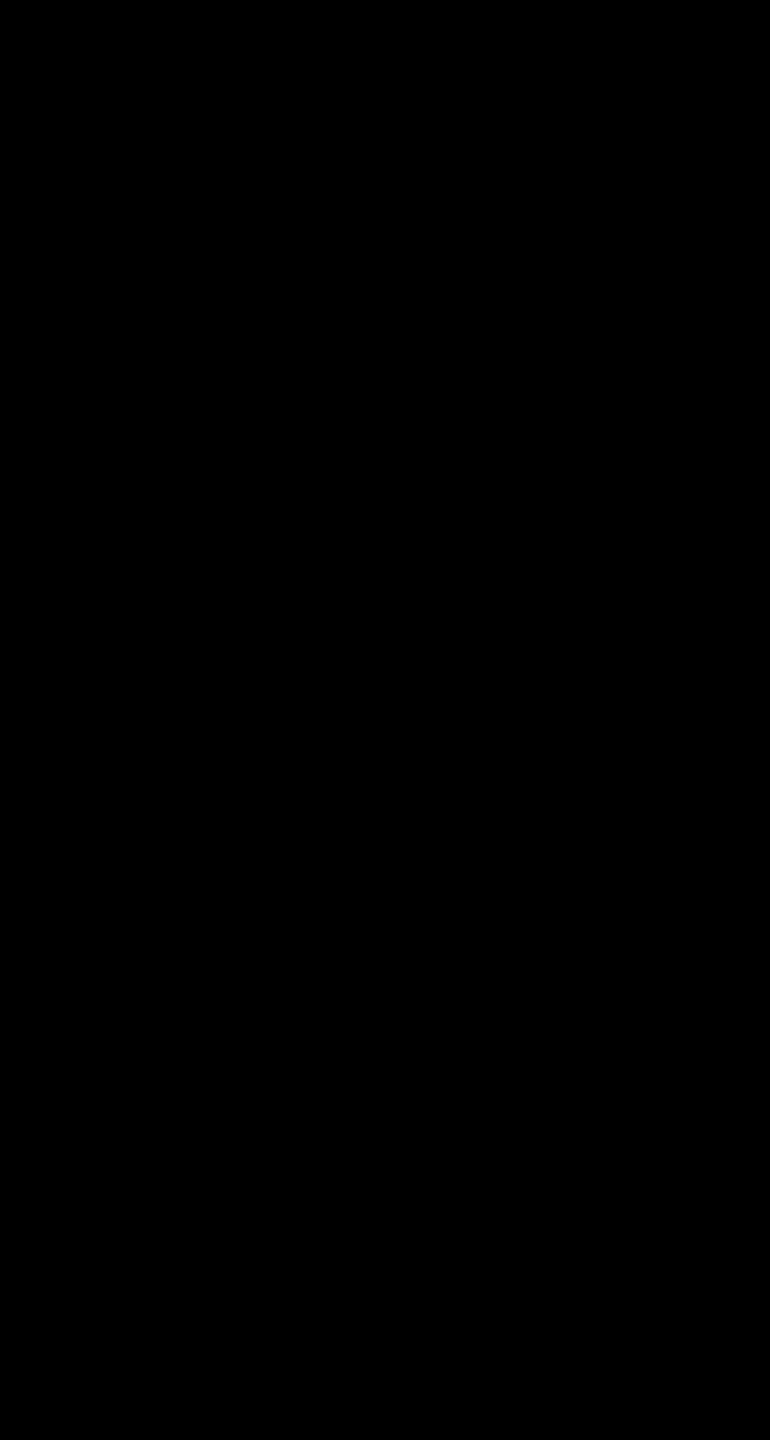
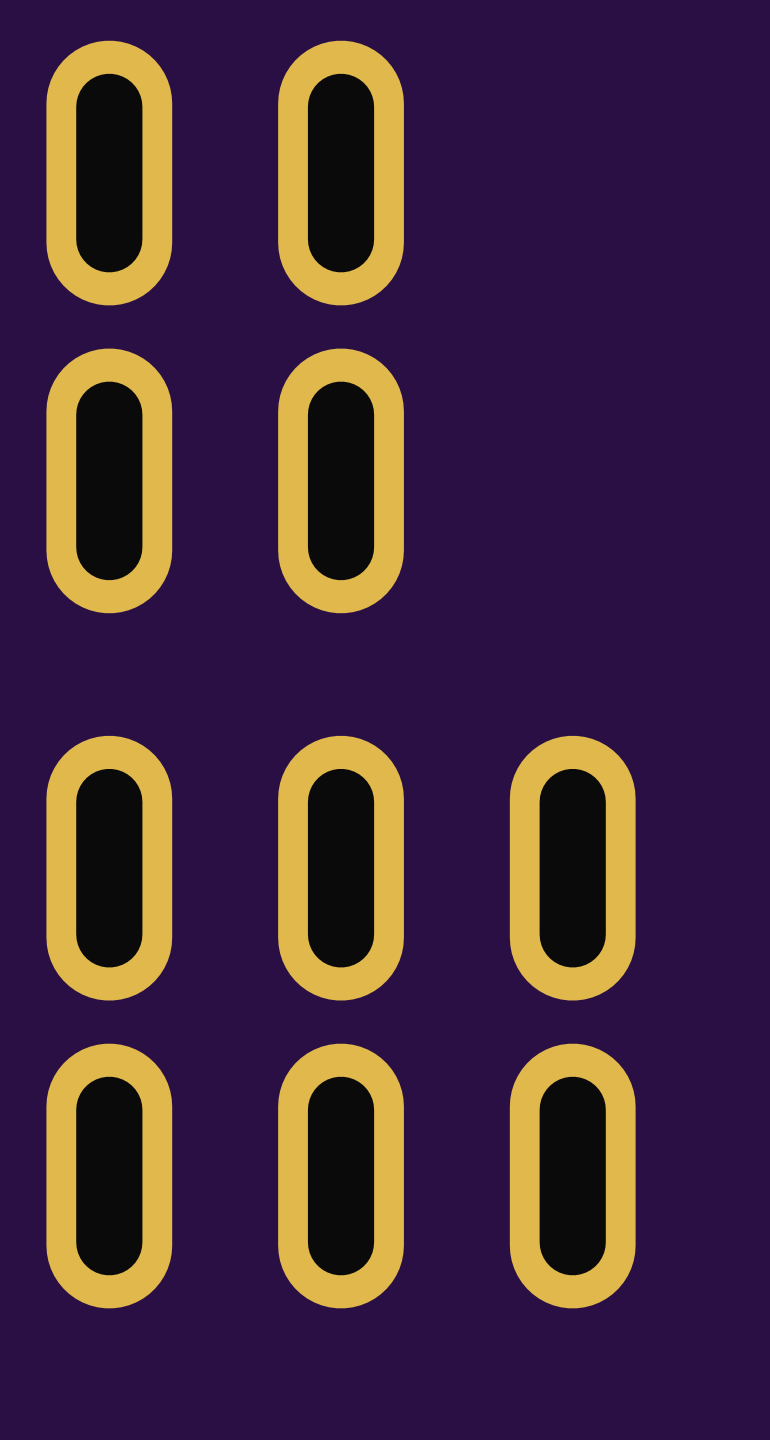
part: none -> (109, 326)
part: none -> (341, 326)
part: none -> (109, 1022)
part: none -> (341, 1022)
part: none -> (572, 1022)

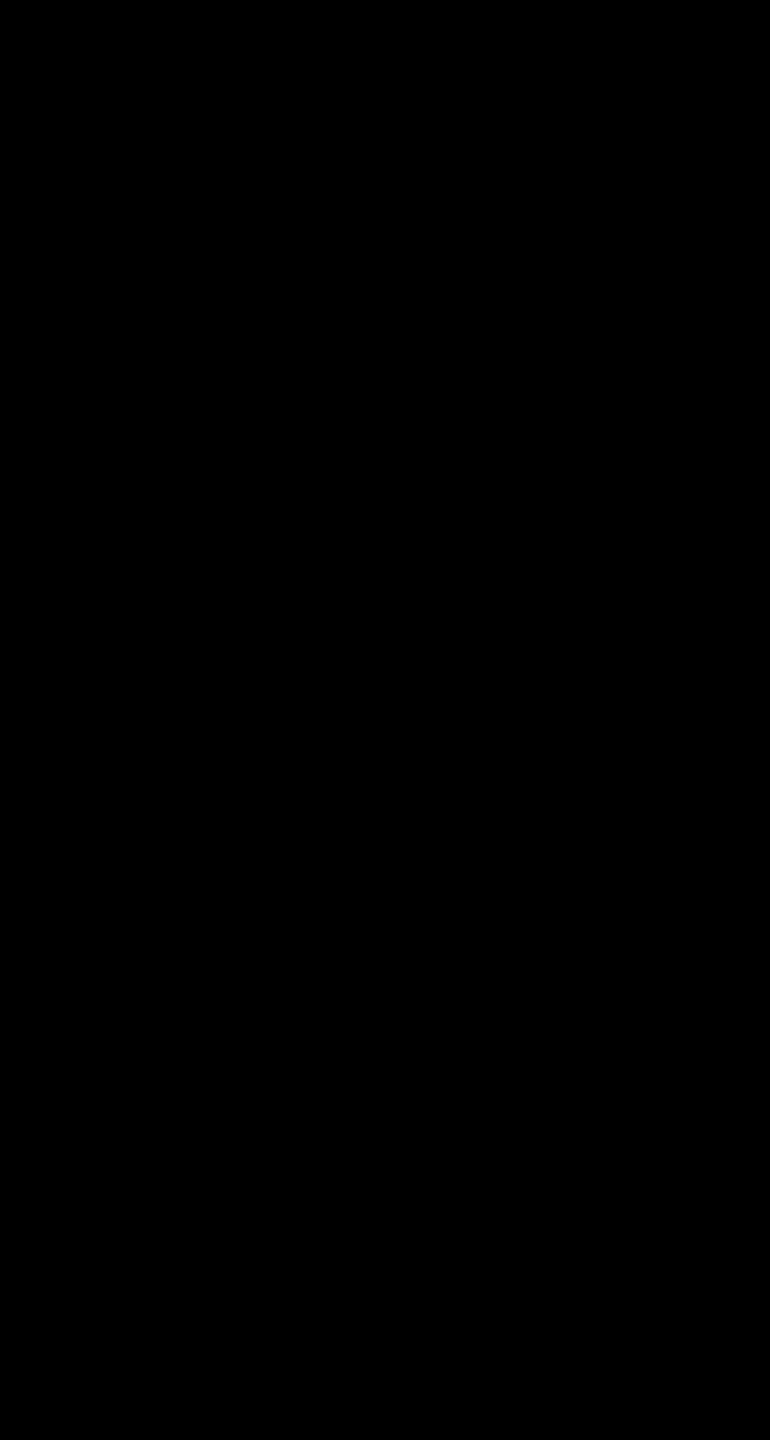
part: (109, 326) -> none
part: (341, 326) -> none
part: (109, 1022) -> none
part: (341, 1022) -> none
part: (572, 1022) -> none

